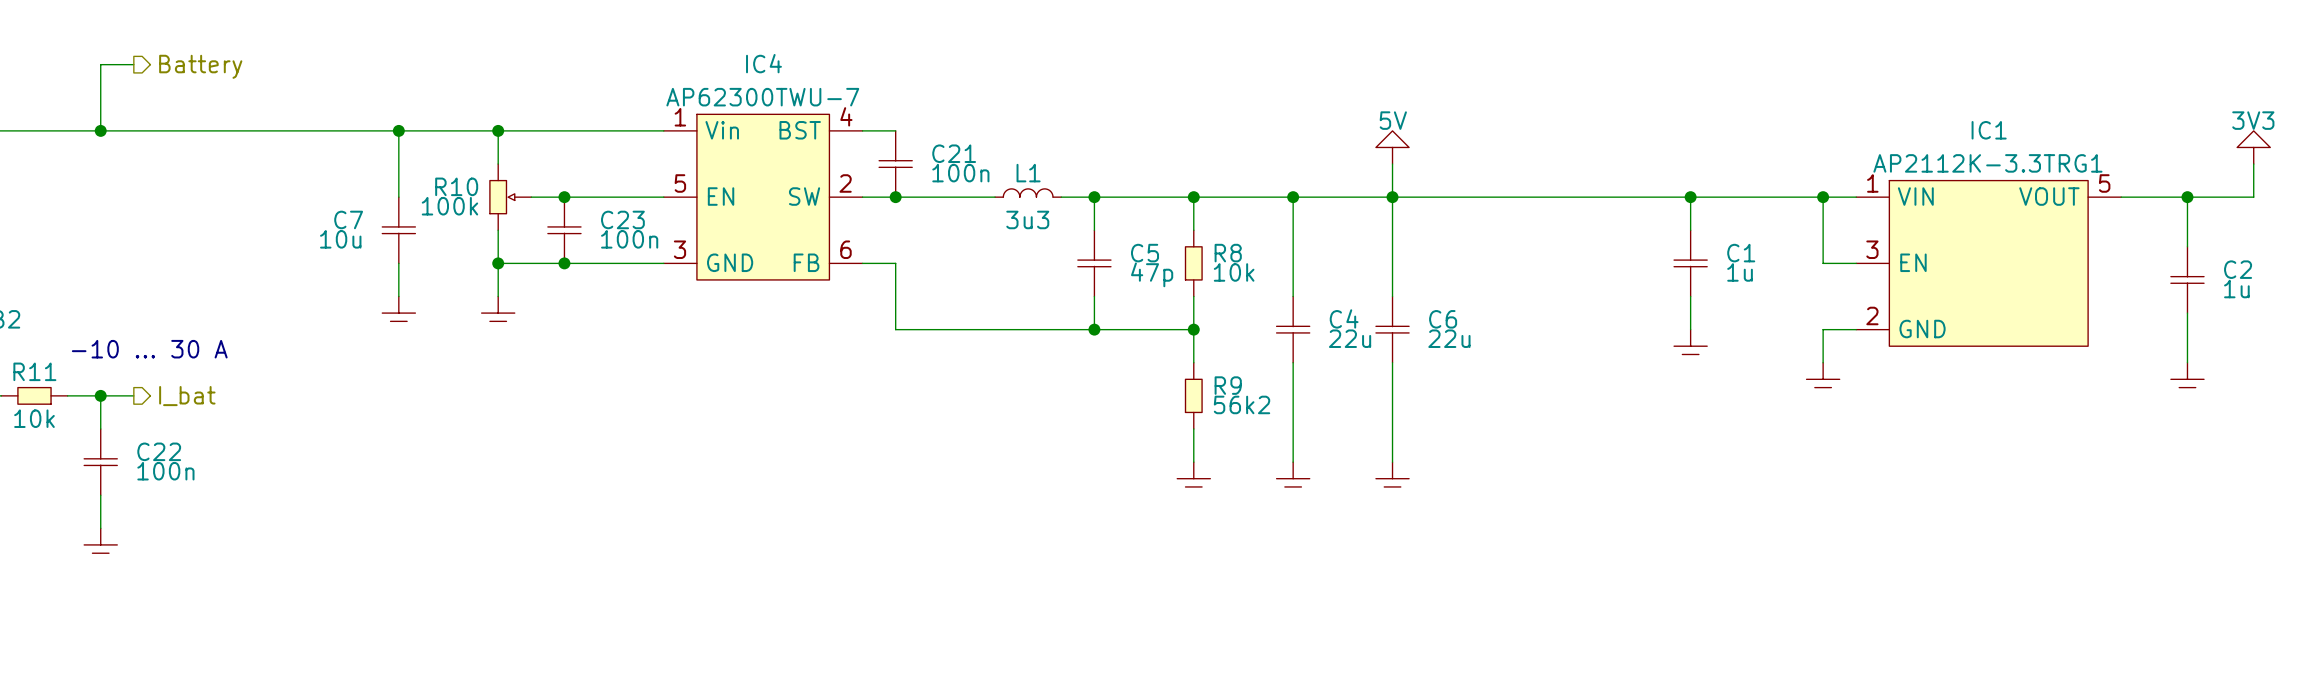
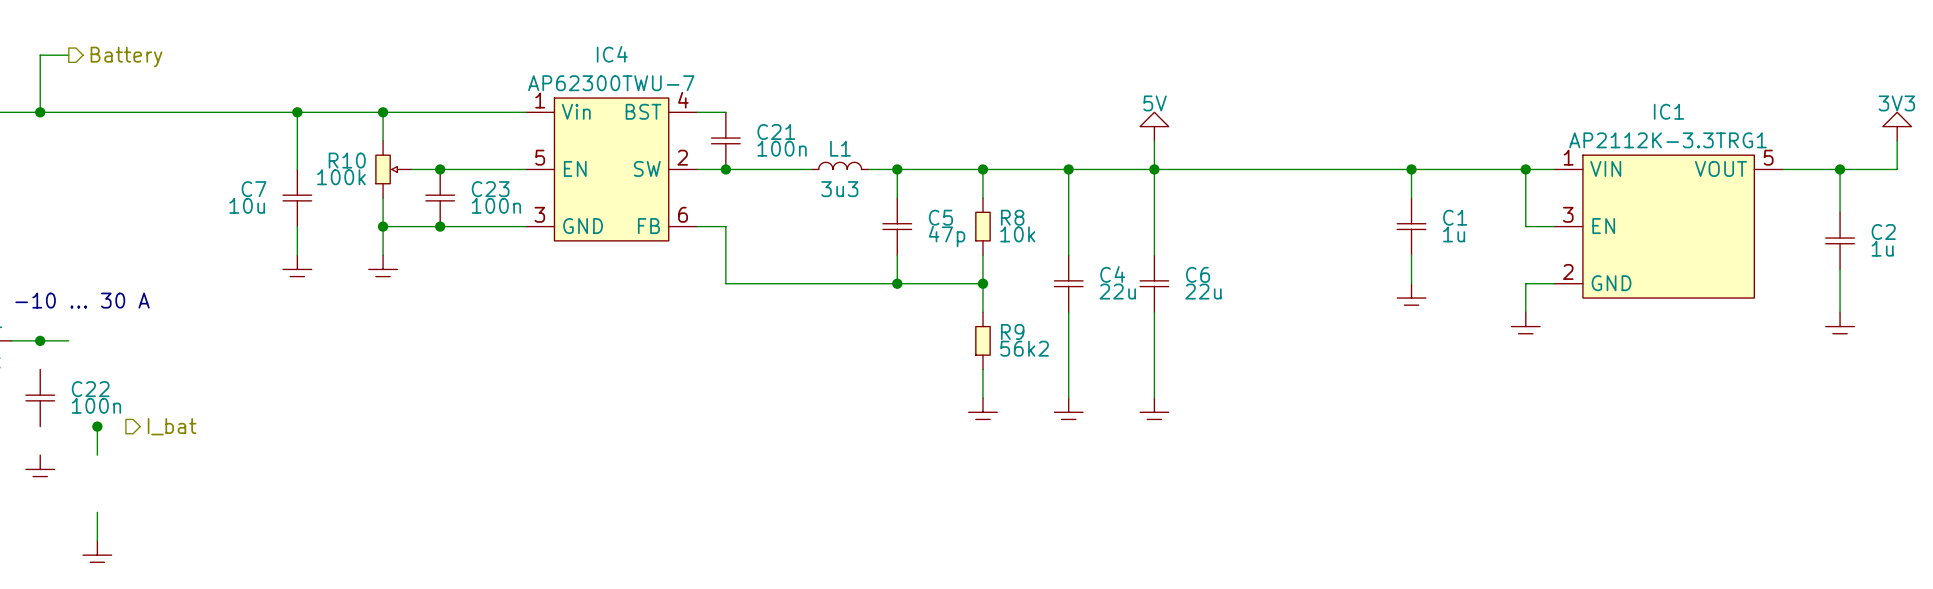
wire: (100, 395) (100, 429) -> (97, 426) (97, 455)
hierarchical label position: I_bat (187, 396) -> I_bat (172, 426)
wire: (100, 495) (100, 528) -> (97, 512) (97, 540)
junction: none -> (97, 426)
power symbol: none -> (97, 555)

